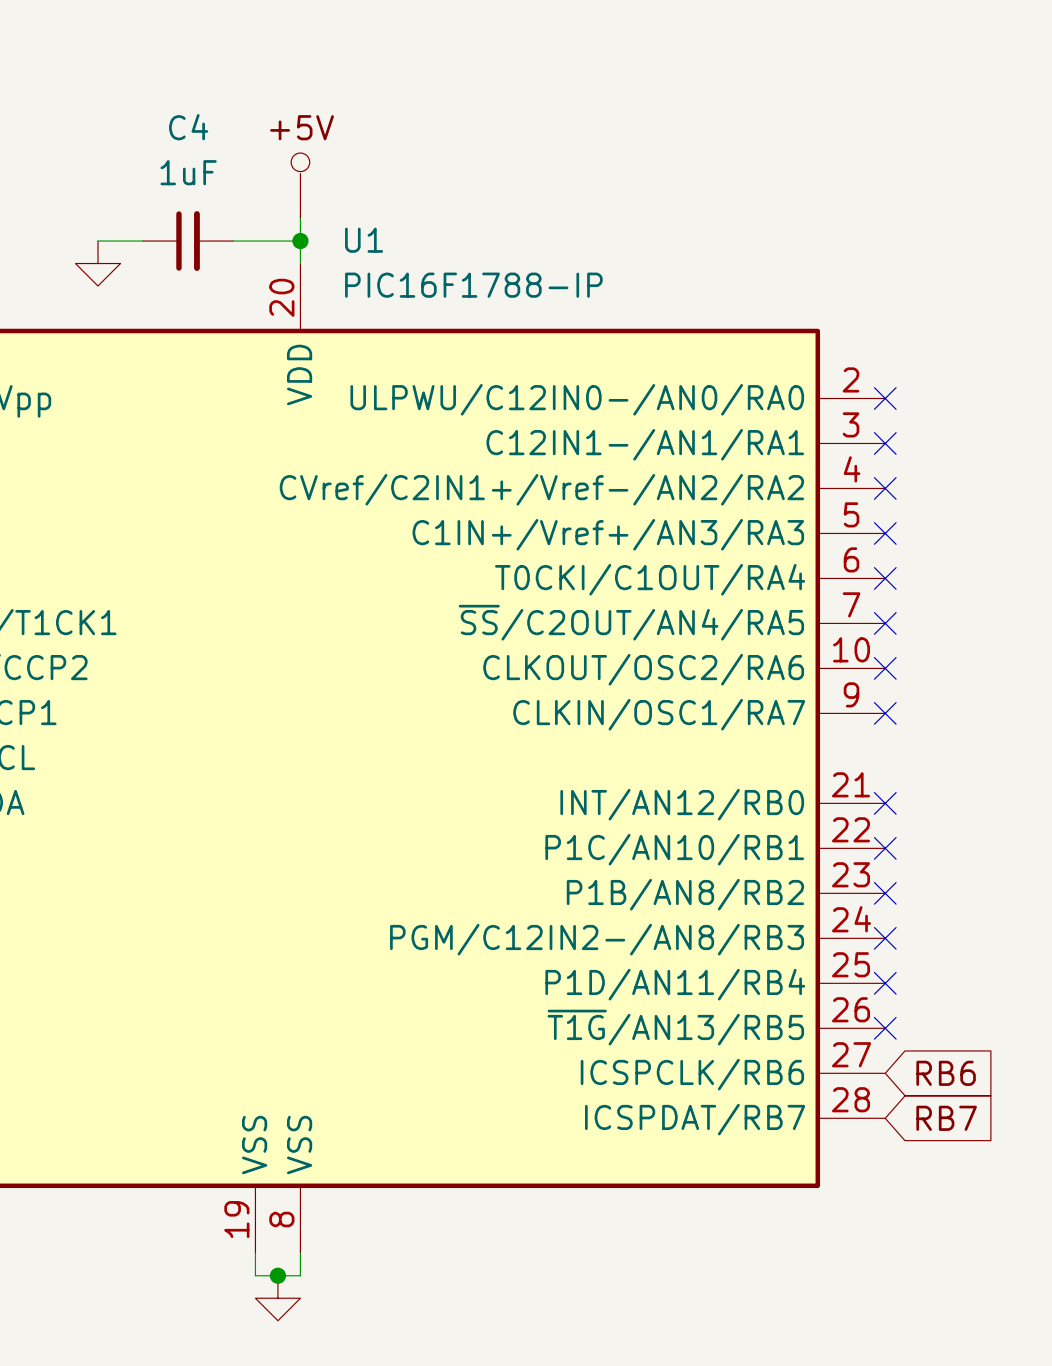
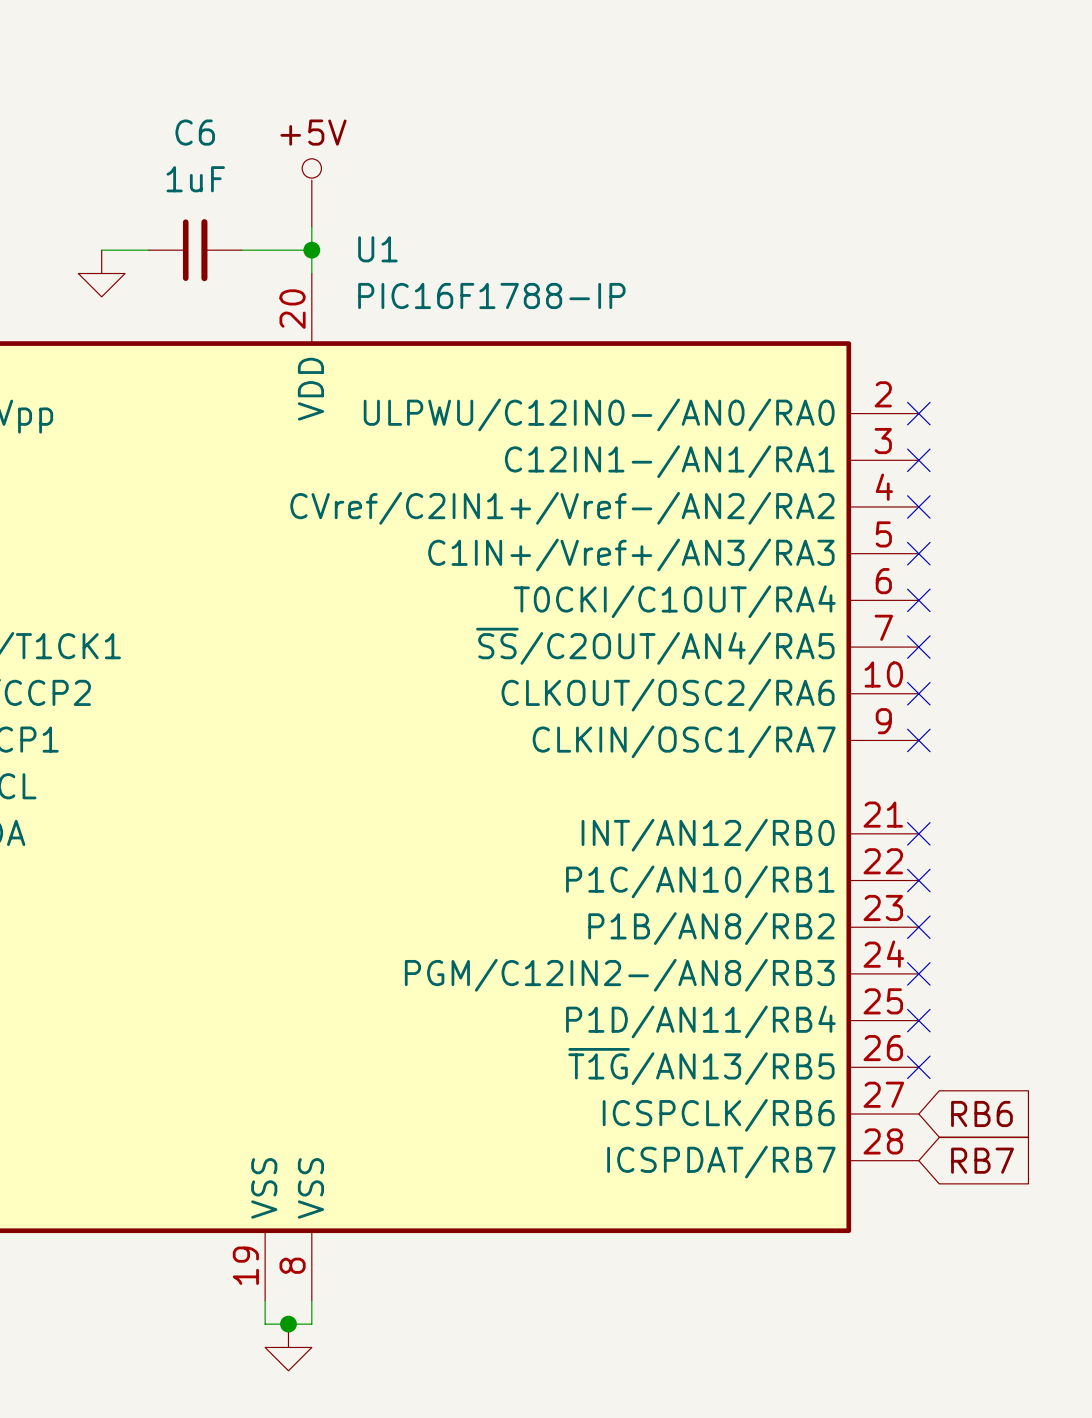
C4 name: C4 (188, 127) -> C6 (195, 132)

